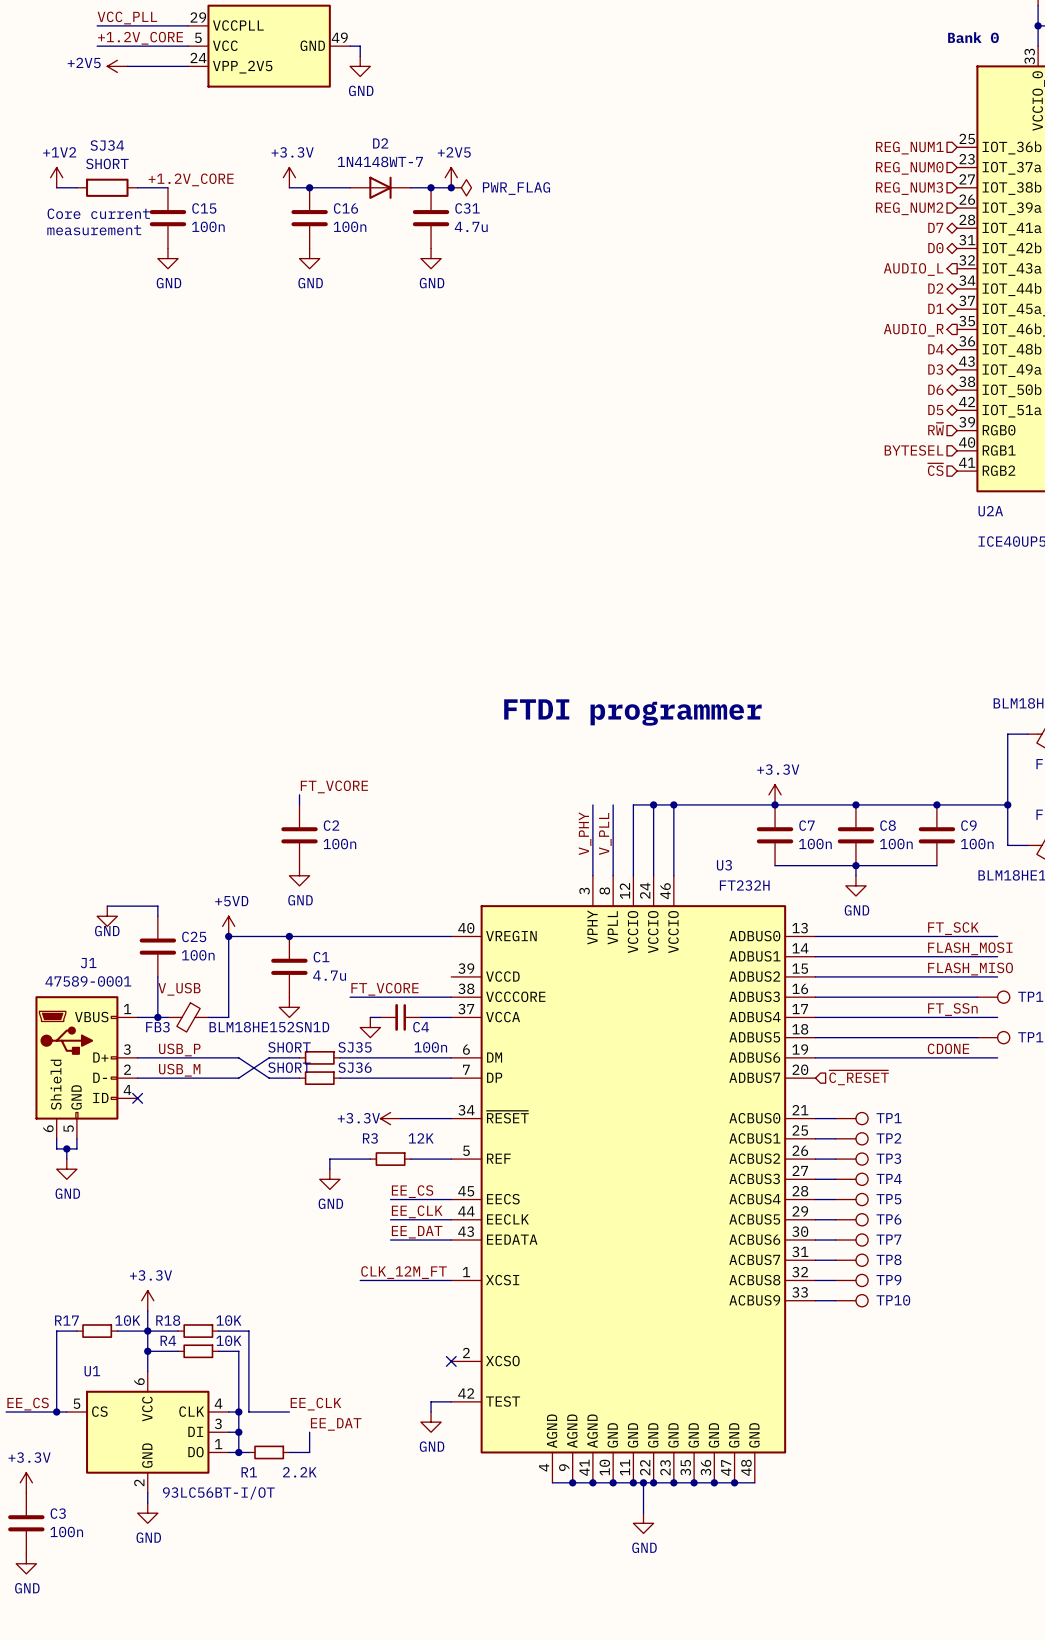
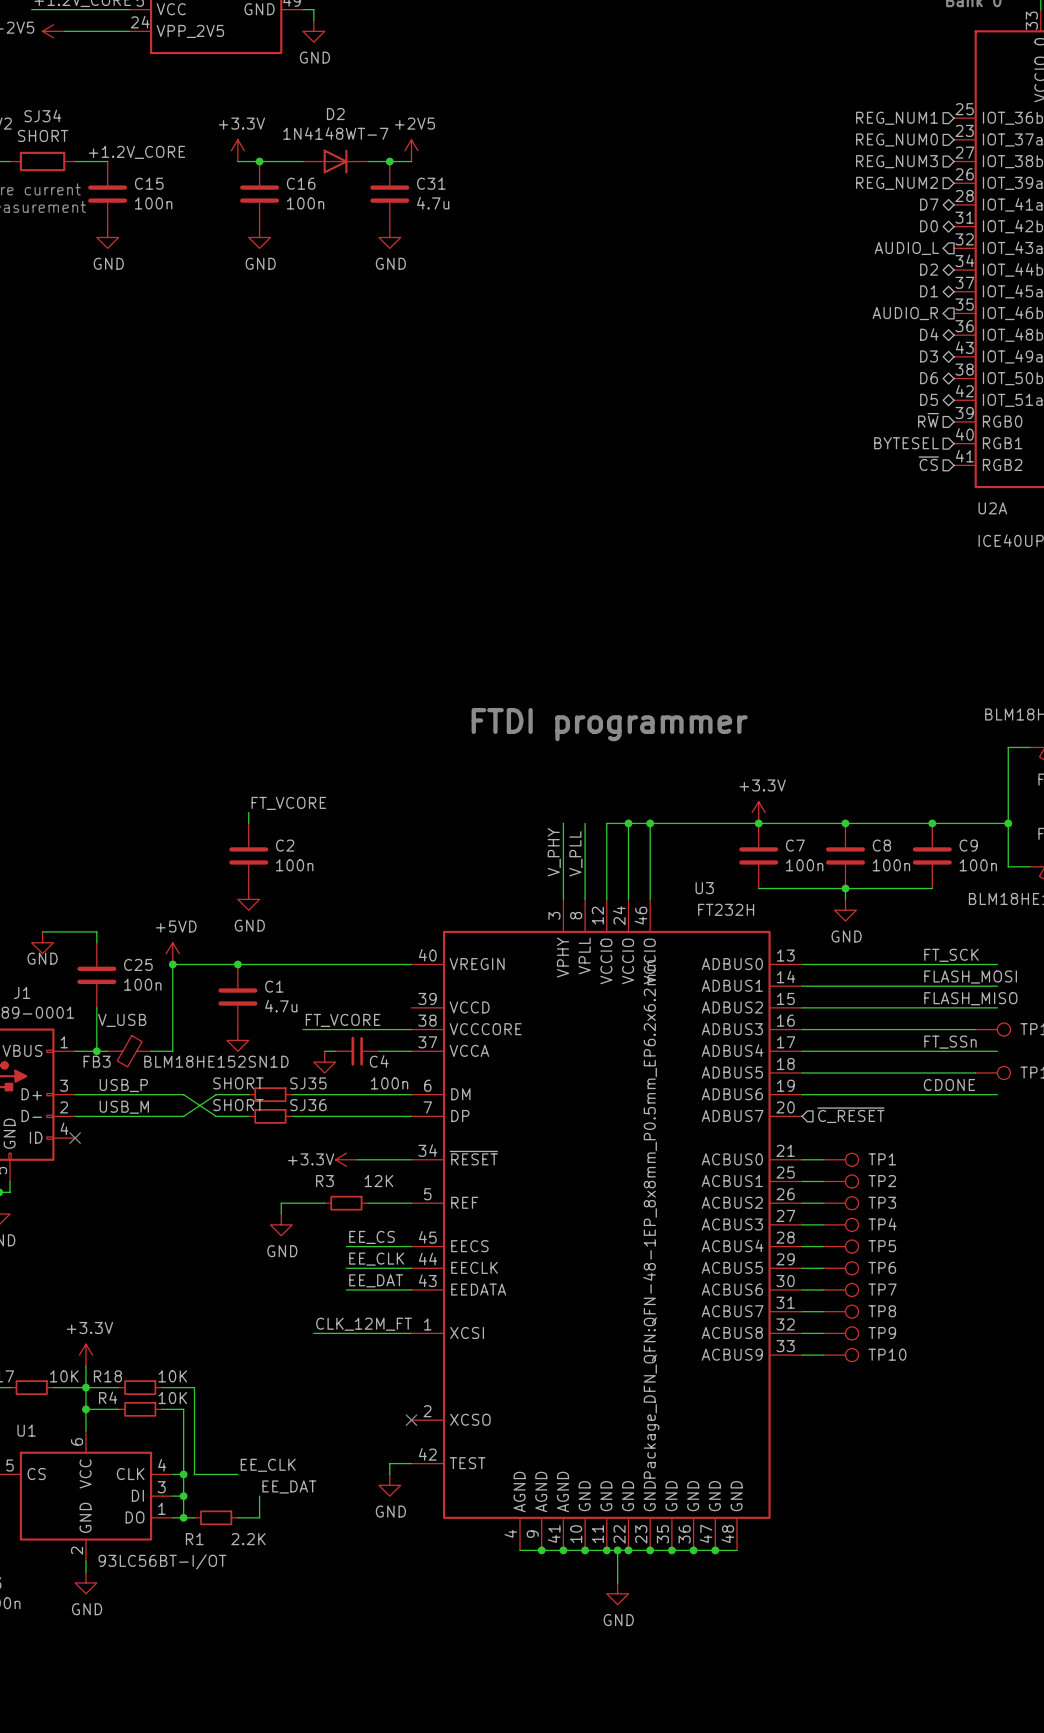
junction: (451, 187) -> none
power symbol: PWR_FLAG (461, 187) -> none
U3 text: none -> Package_DFN_QFN:QFN-48-1EP_8x8mm_P0.5mm_EP6.2x6.2mm (651, 1219)

